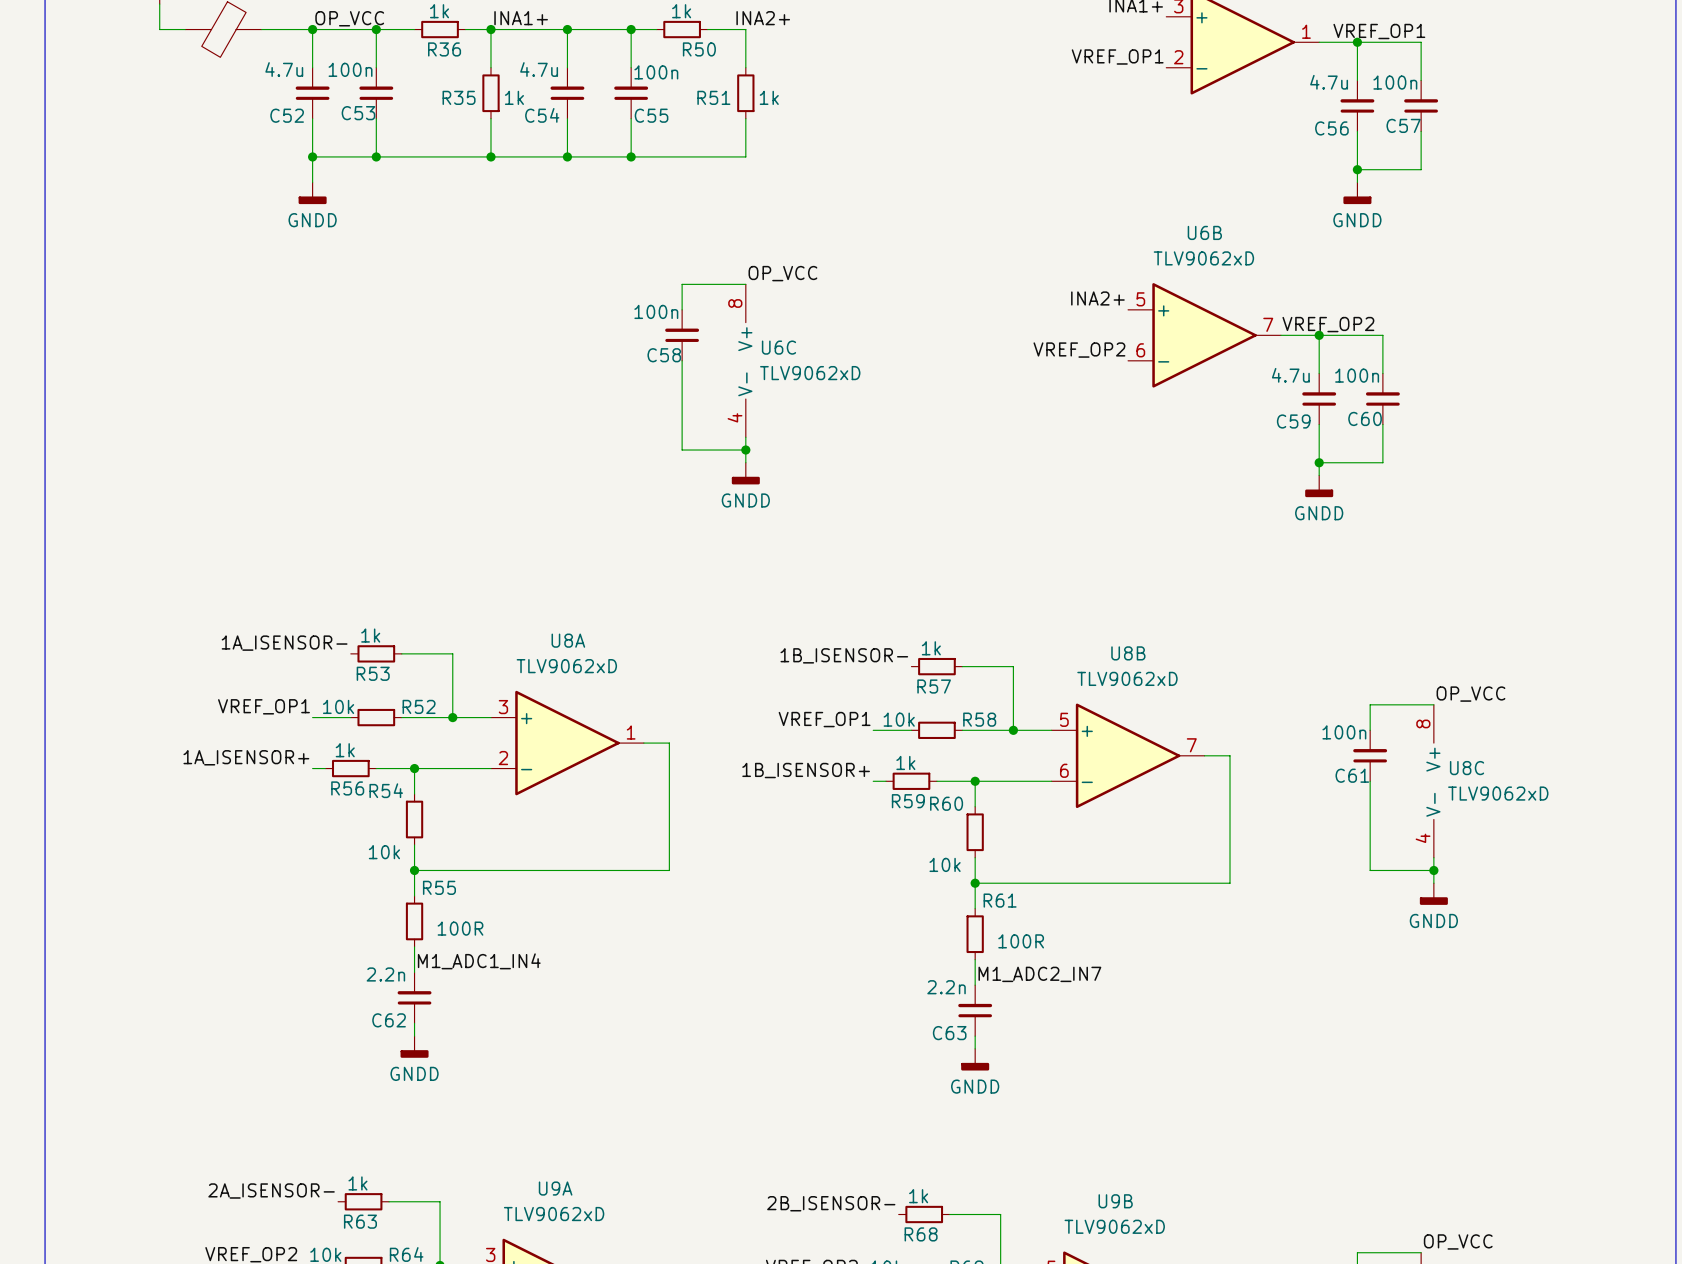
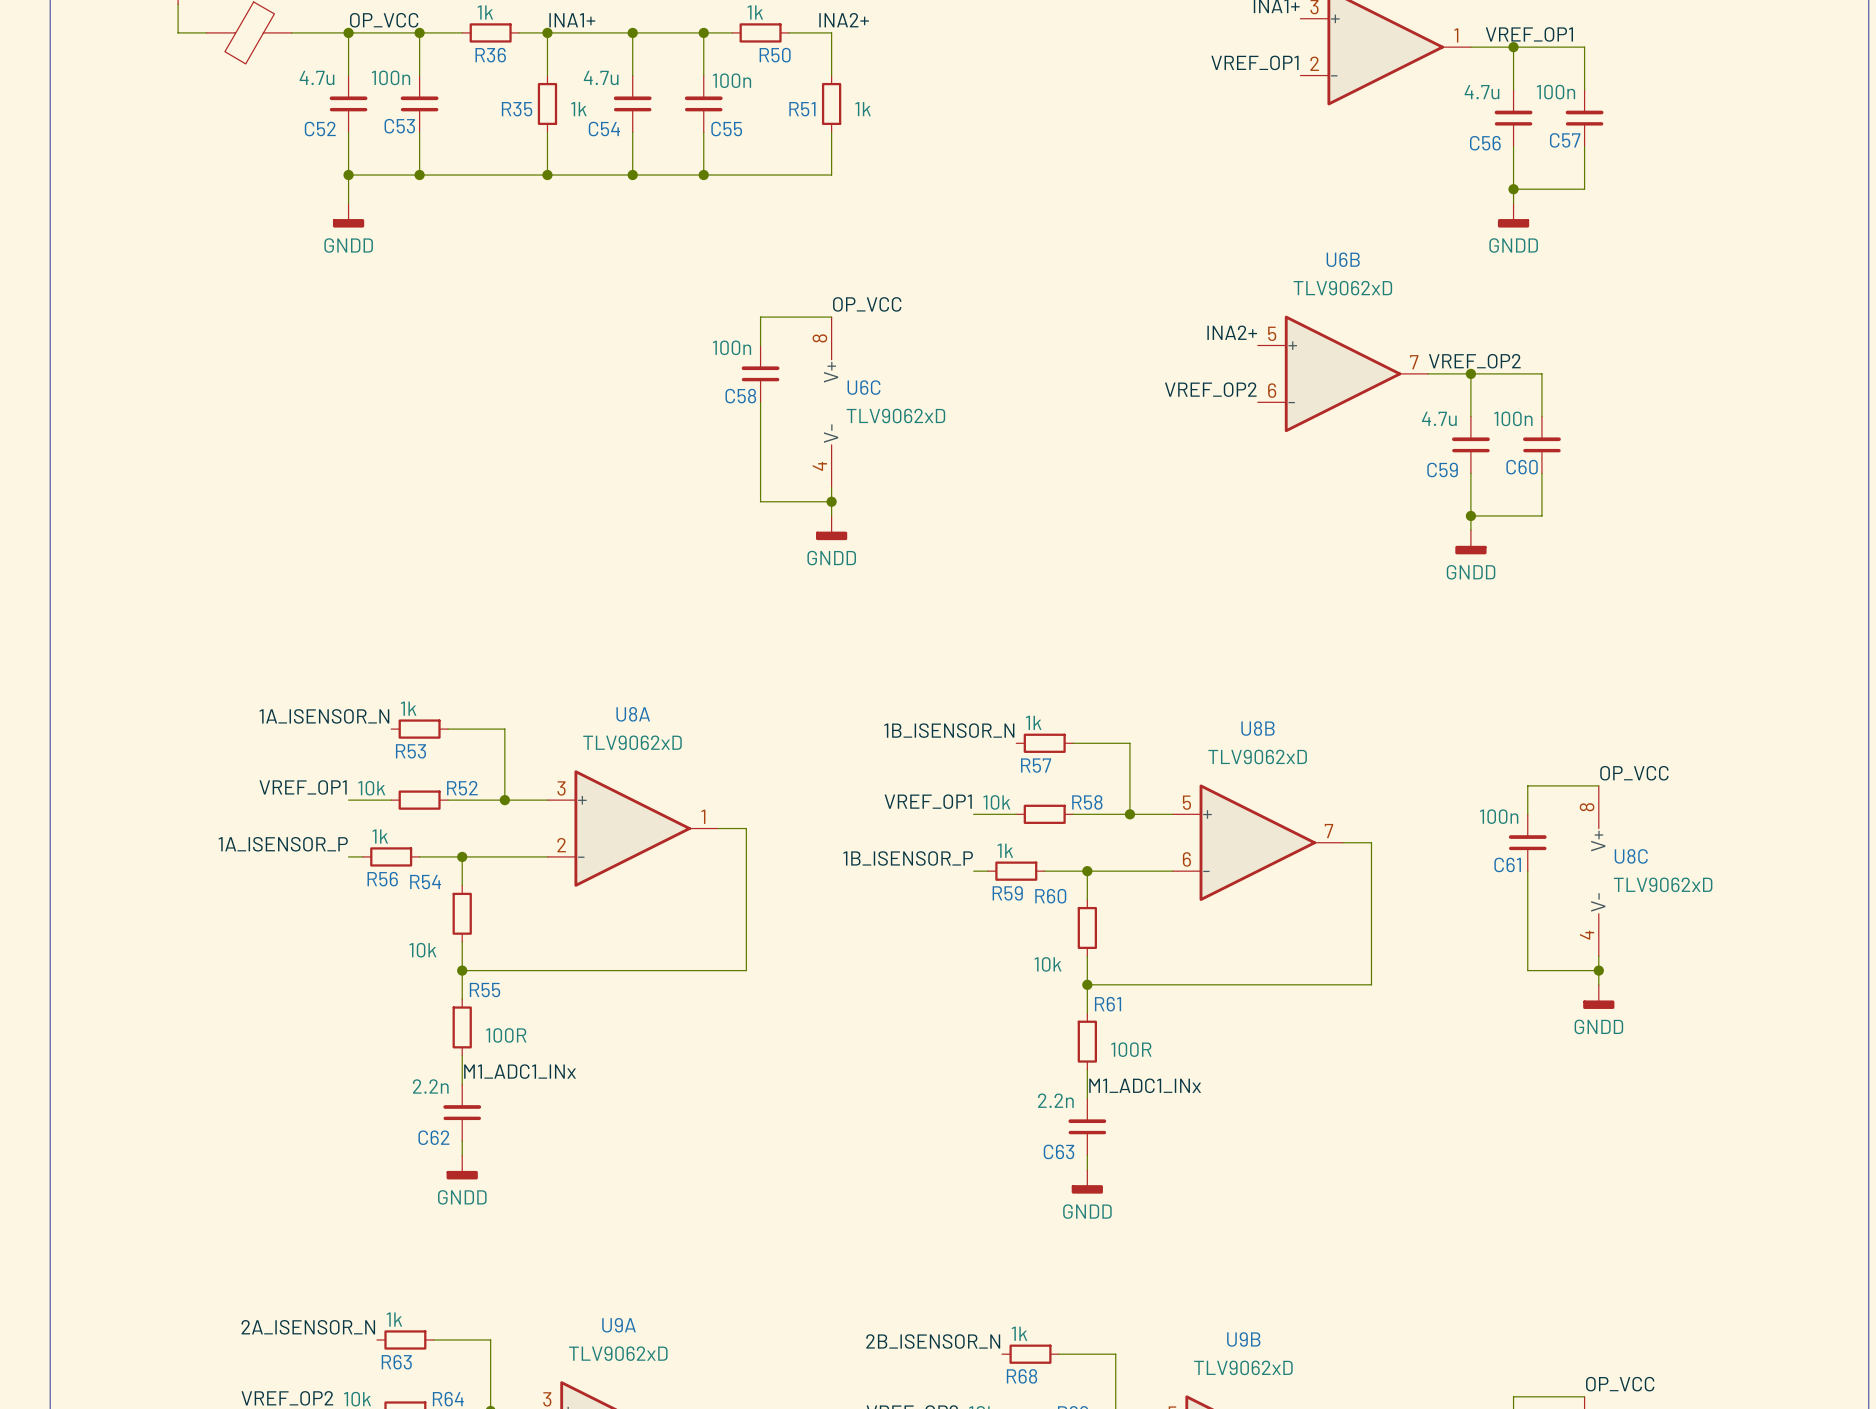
label: 1A_ISENSOR- (284, 643) -> 1A_ISENSOR_N (324, 716)
label: 1B_ISENSOR- (844, 655) -> 1B_ISENSOR_N (949, 730)
label: 1A_ISENSOR+ (246, 757) -> 1A_ISENSOR_P (283, 844)
label: 1B_ISENSOR+ (806, 770) -> 1B_ISENSOR_P (908, 858)
label: M1_ADC1_IN4 (479, 961) -> M1_ADC1_INx (520, 1071)
label: M1_ADC2_IN7 (1039, 974) -> M1_ADC1_INx (1145, 1085)
label: 2A_ISENSOR- (271, 1191) -> 2A_ISENSOR_N (308, 1327)
label: 2B_ISENSOR- (831, 1203) -> 2B_ISENSOR_N (933, 1341)

